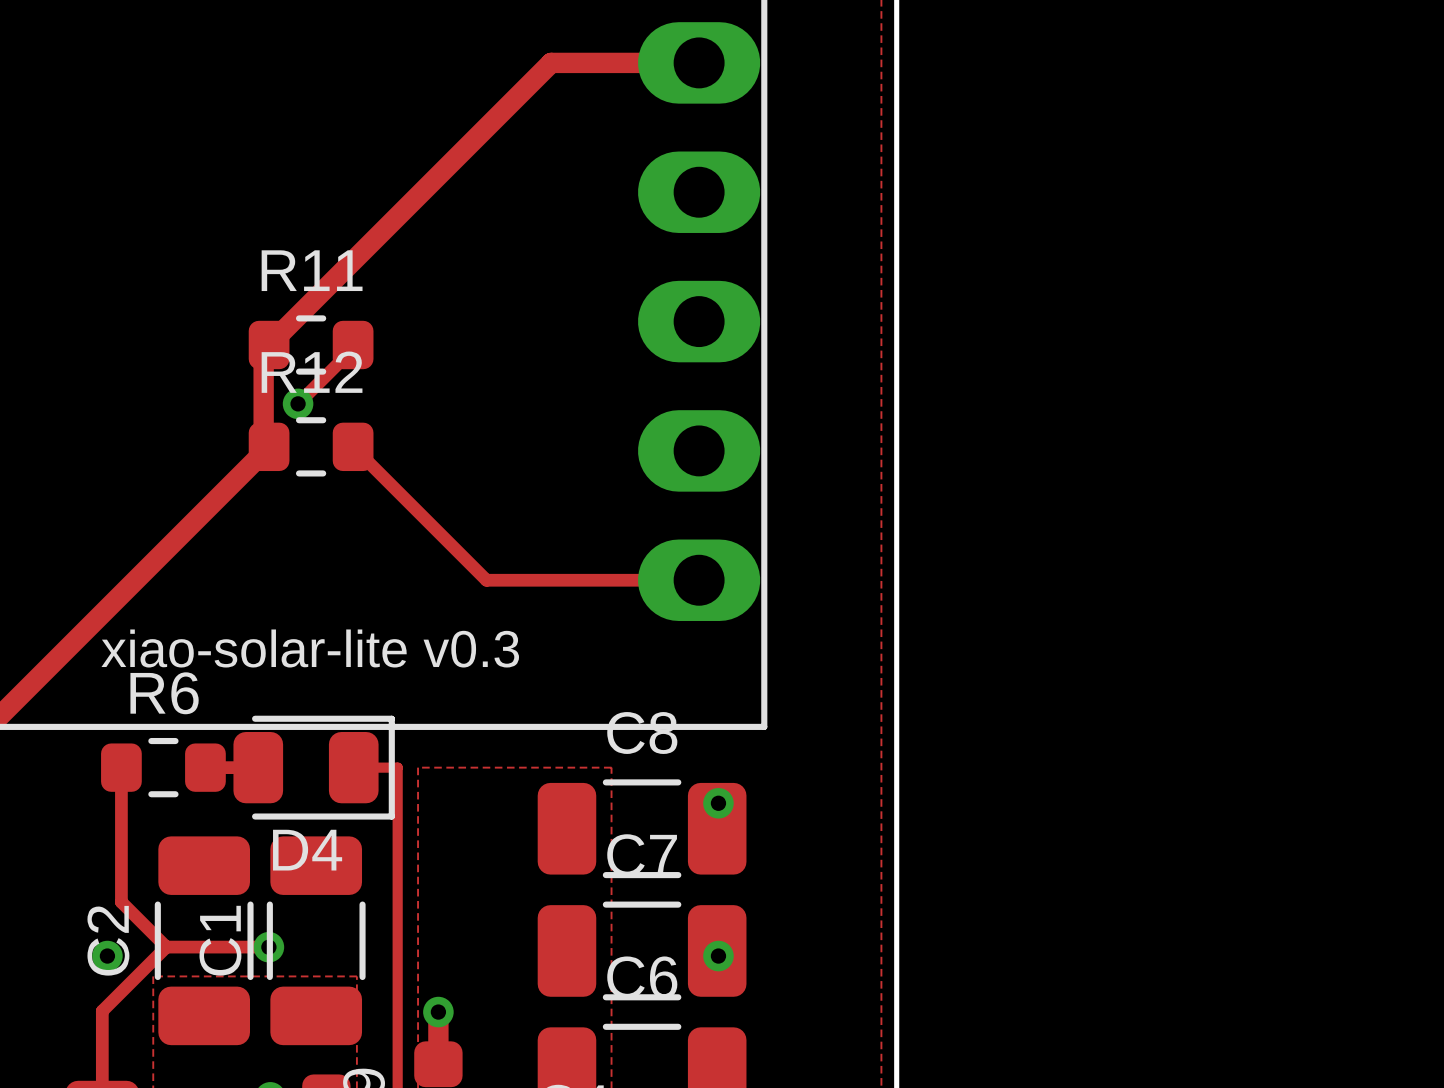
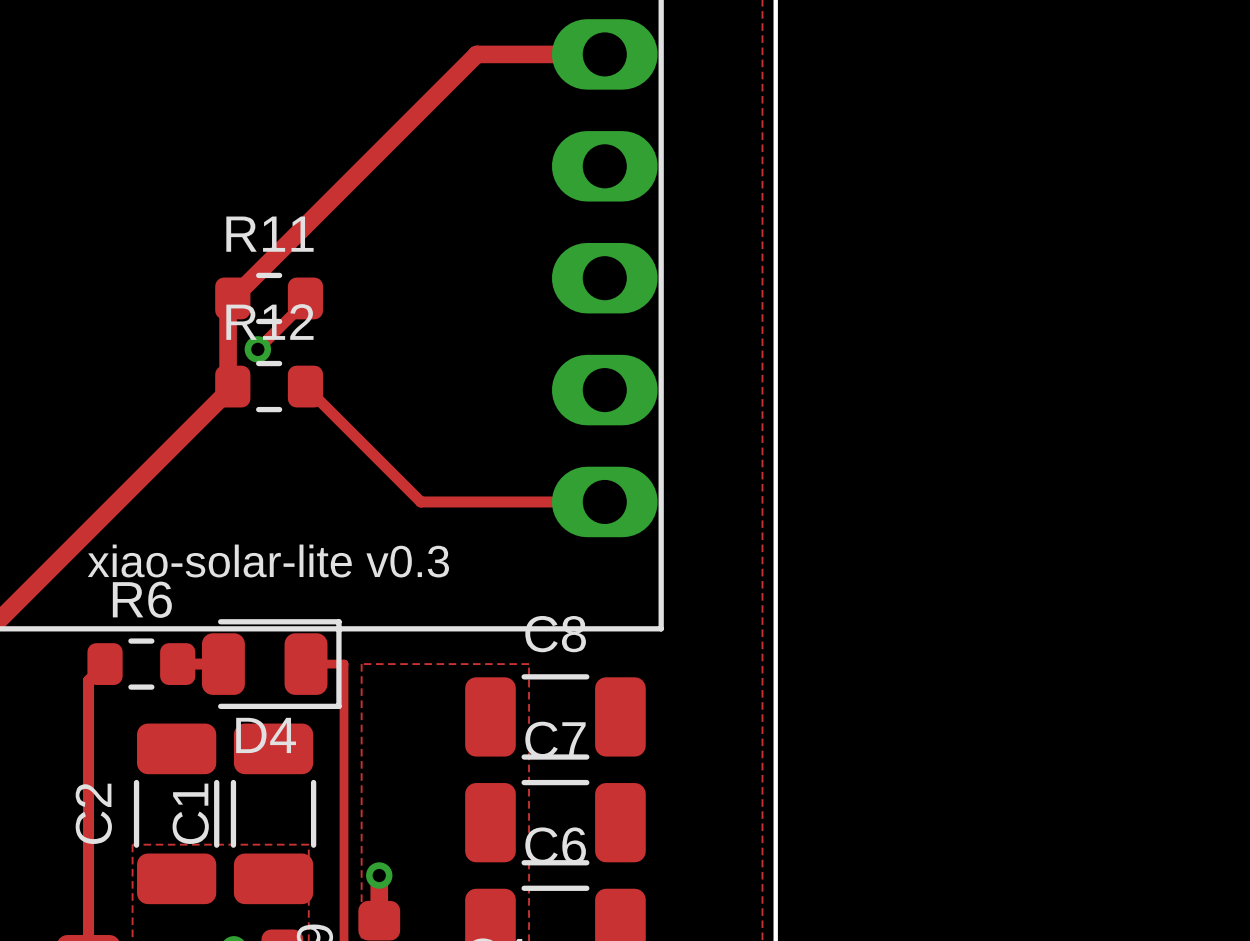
track: (121, 767) (121, 902) (166, 947) -> (105, 664) (88, 680) (88, 874)
via: (718, 803) -> none
track: (166, 947) (268, 947) -> none
track: (166, 947) (102, 1011) -> none
via: (268, 947) -> none
via: (107, 956) -> none
via: (718, 956) -> none

